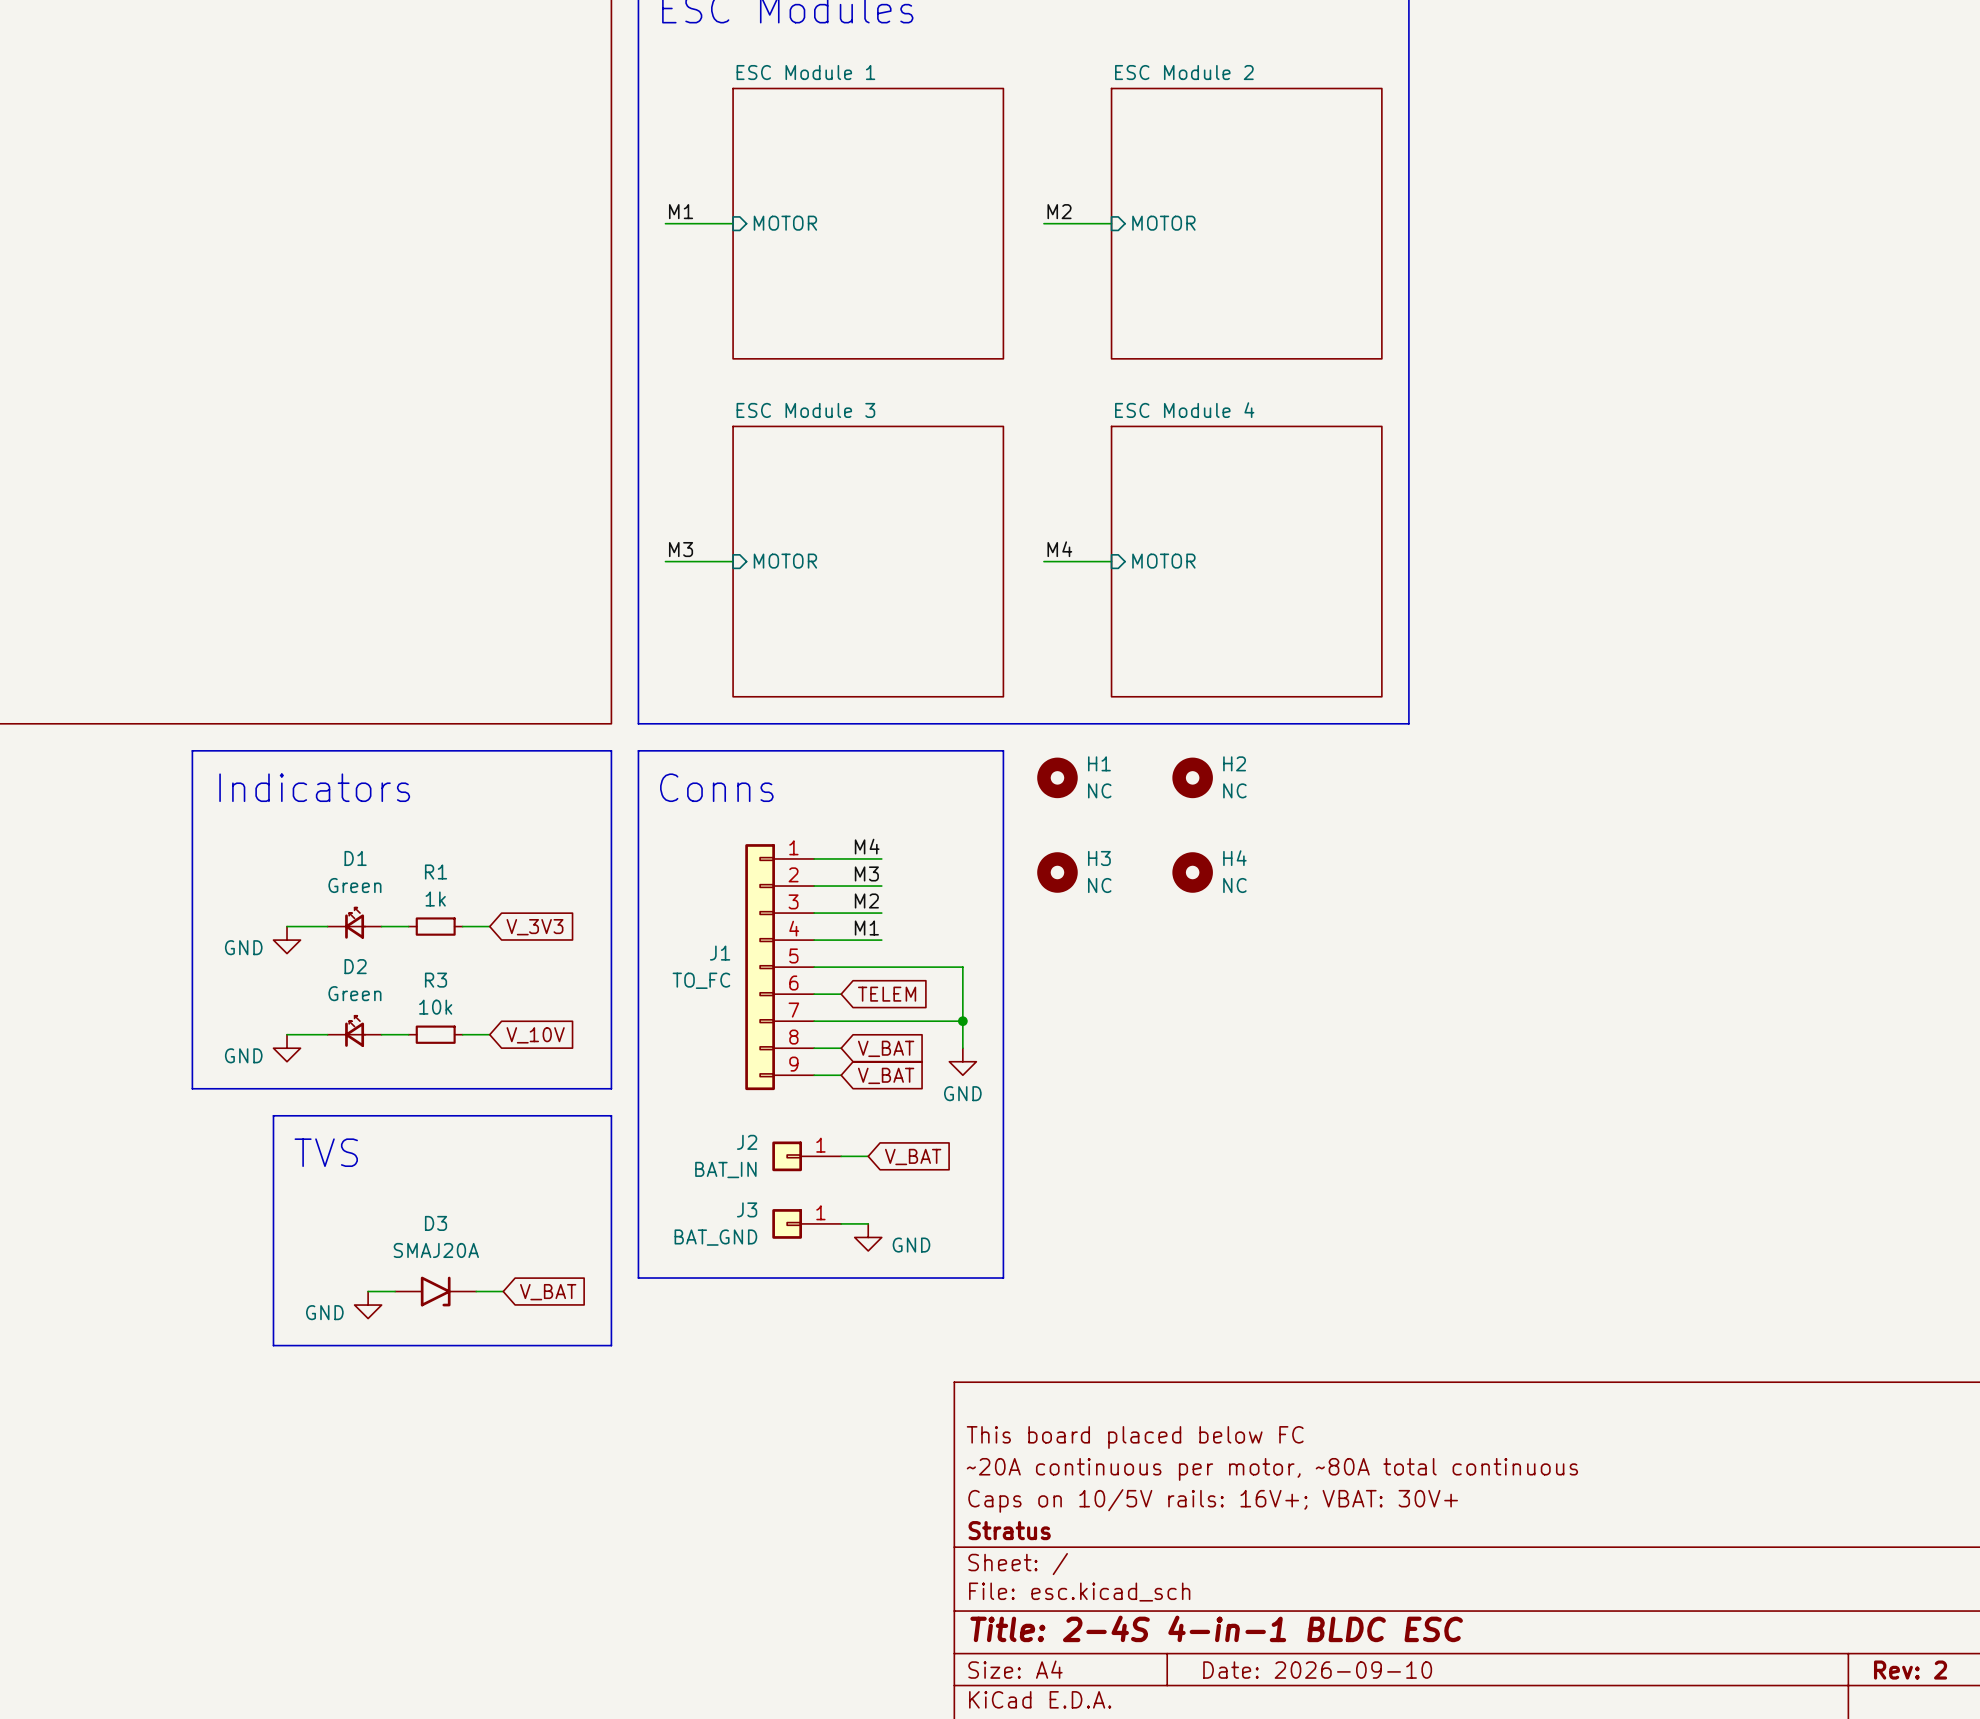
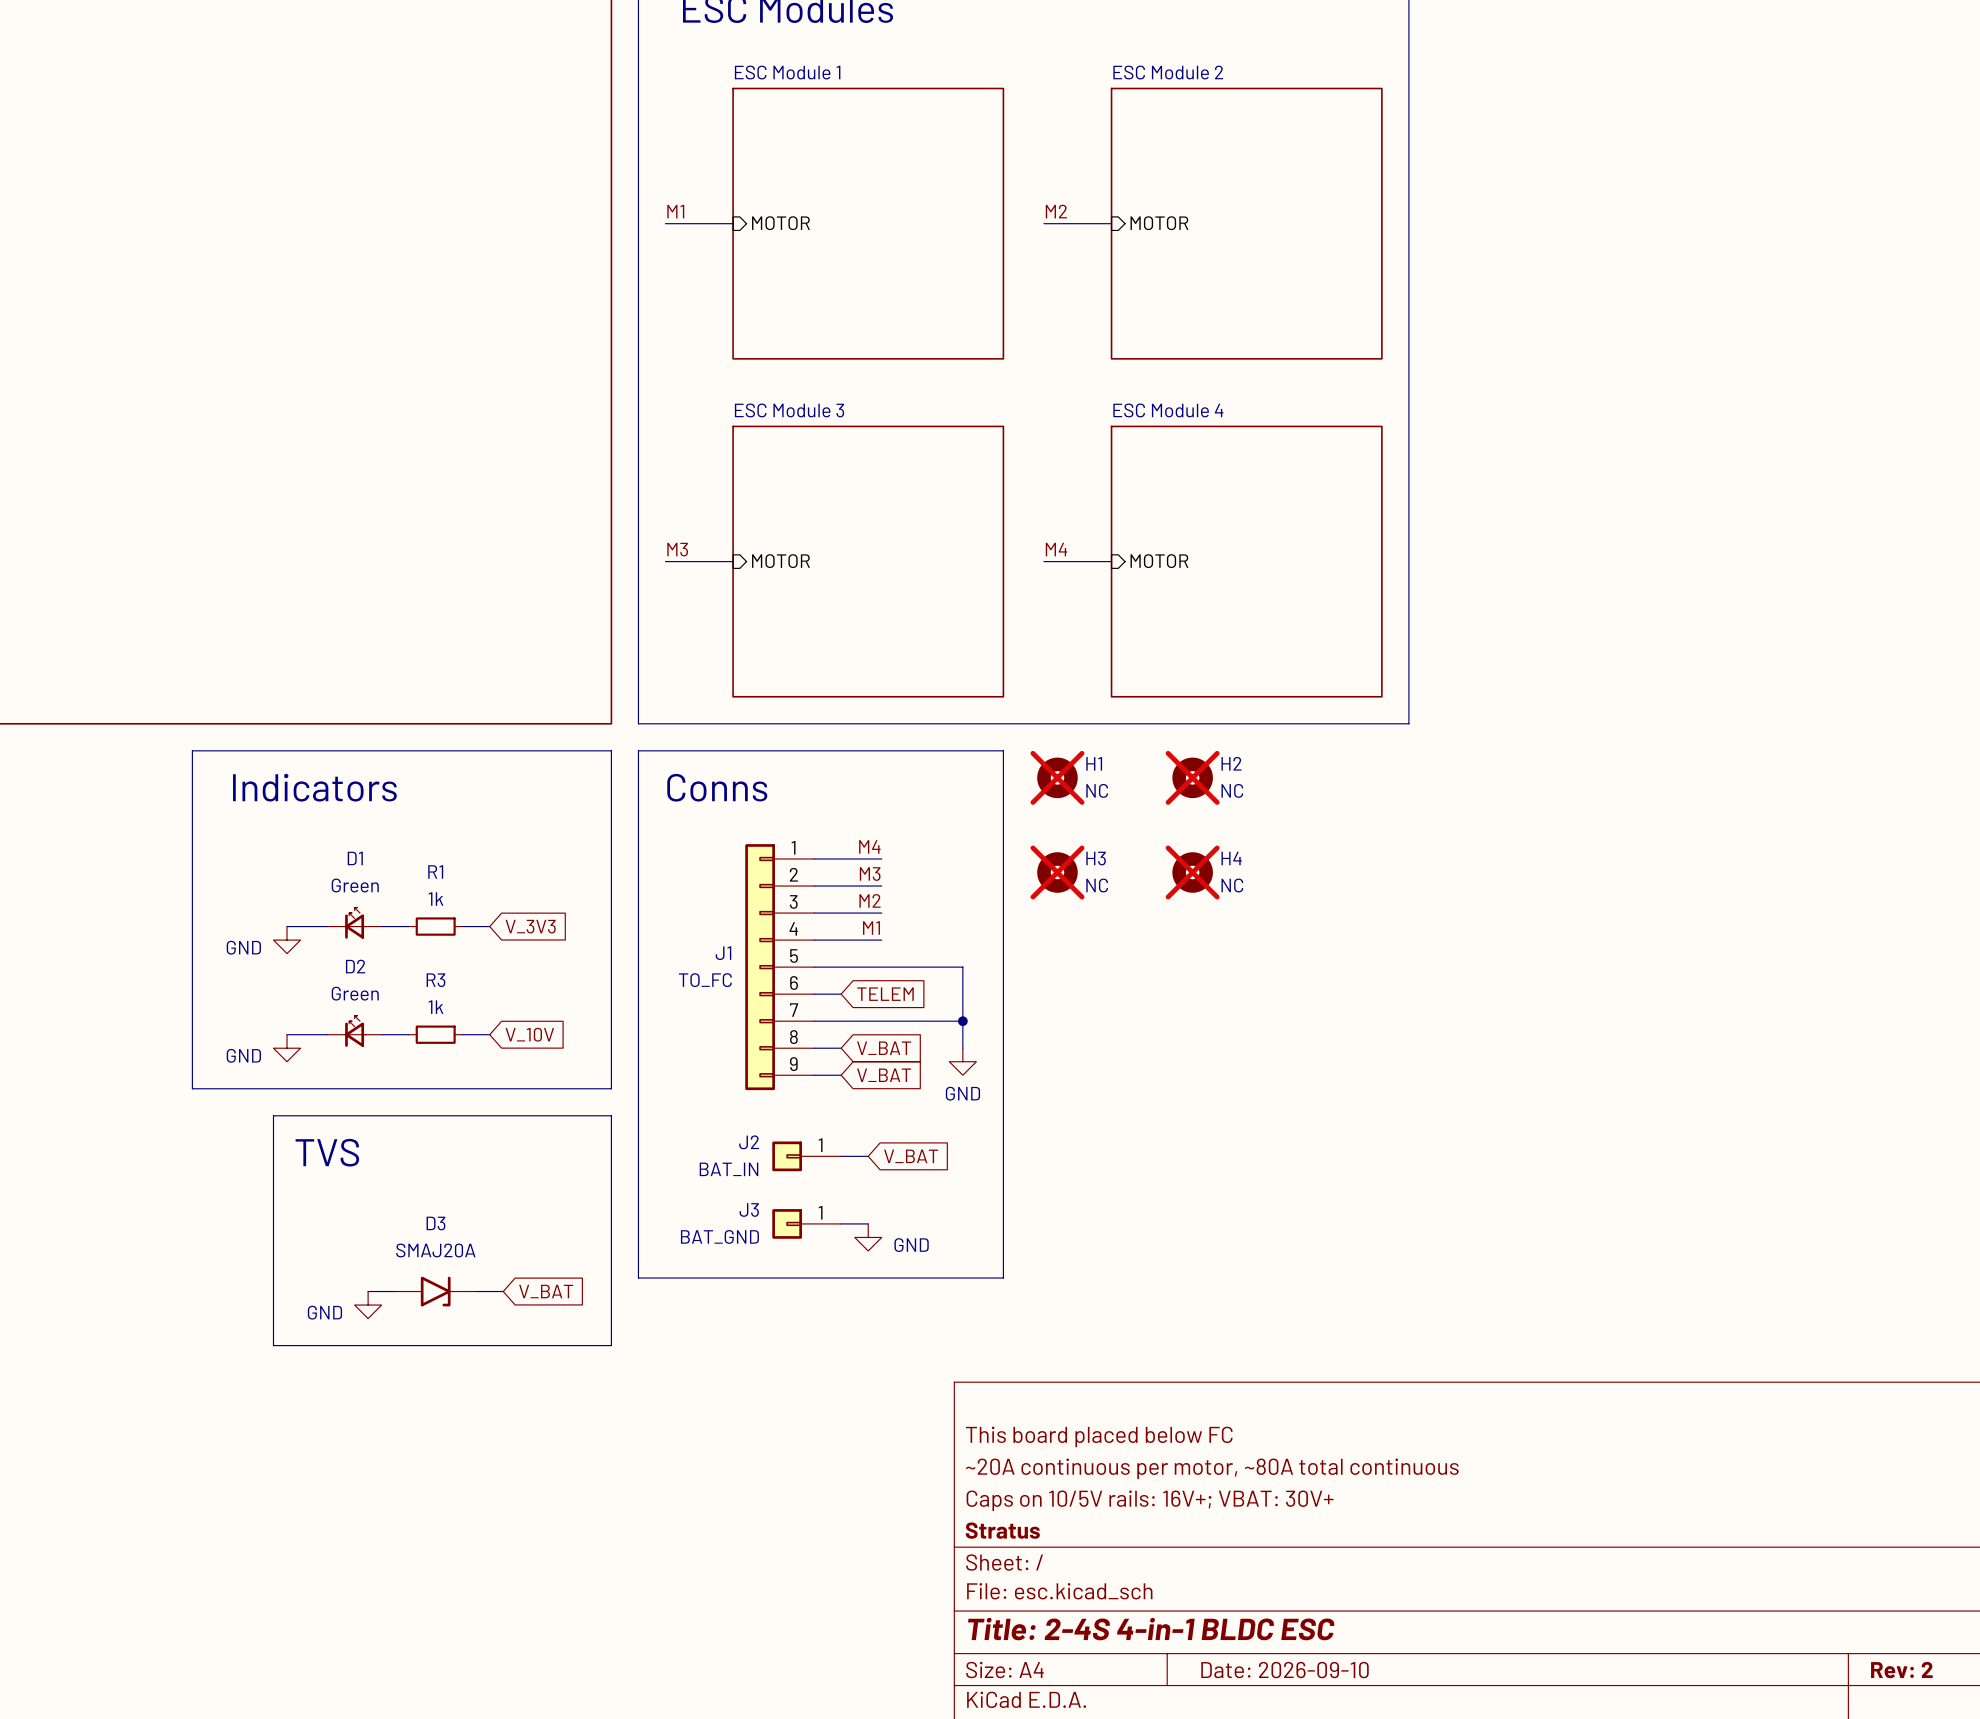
H1 do-not-place cross: none -> (1057, 777)
H2 do-not-place cross: none -> (1192, 777)
H3 do-not-place cross: none -> (1057, 872)
H4 do-not-place cross: none -> (1192, 872)
R3 value: 10k (435, 1007) -> 1k (435, 1007)

